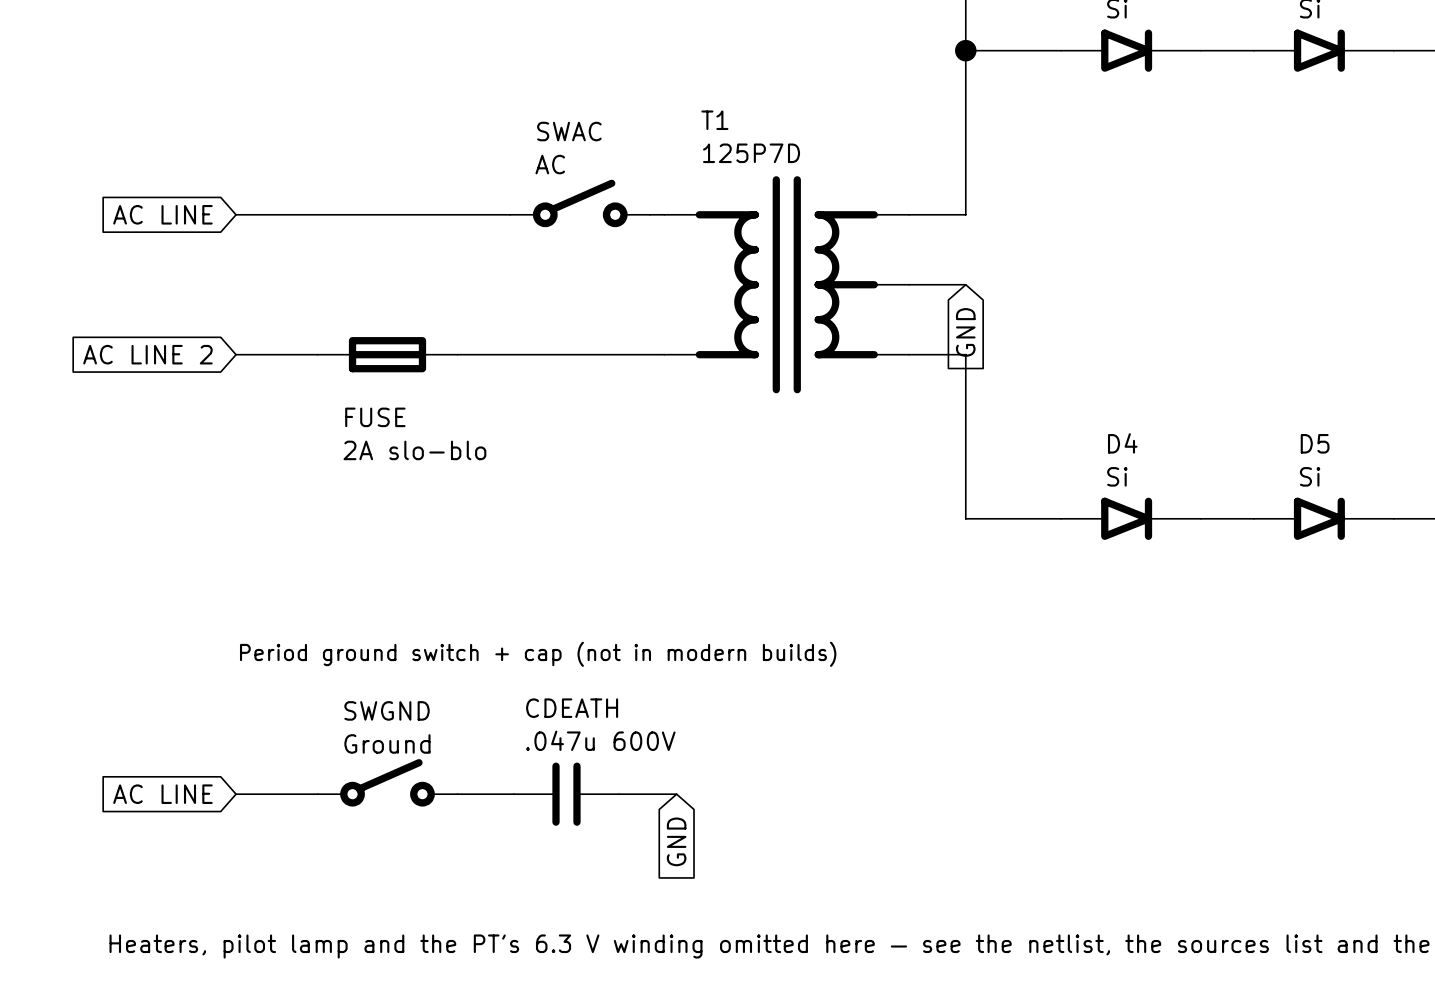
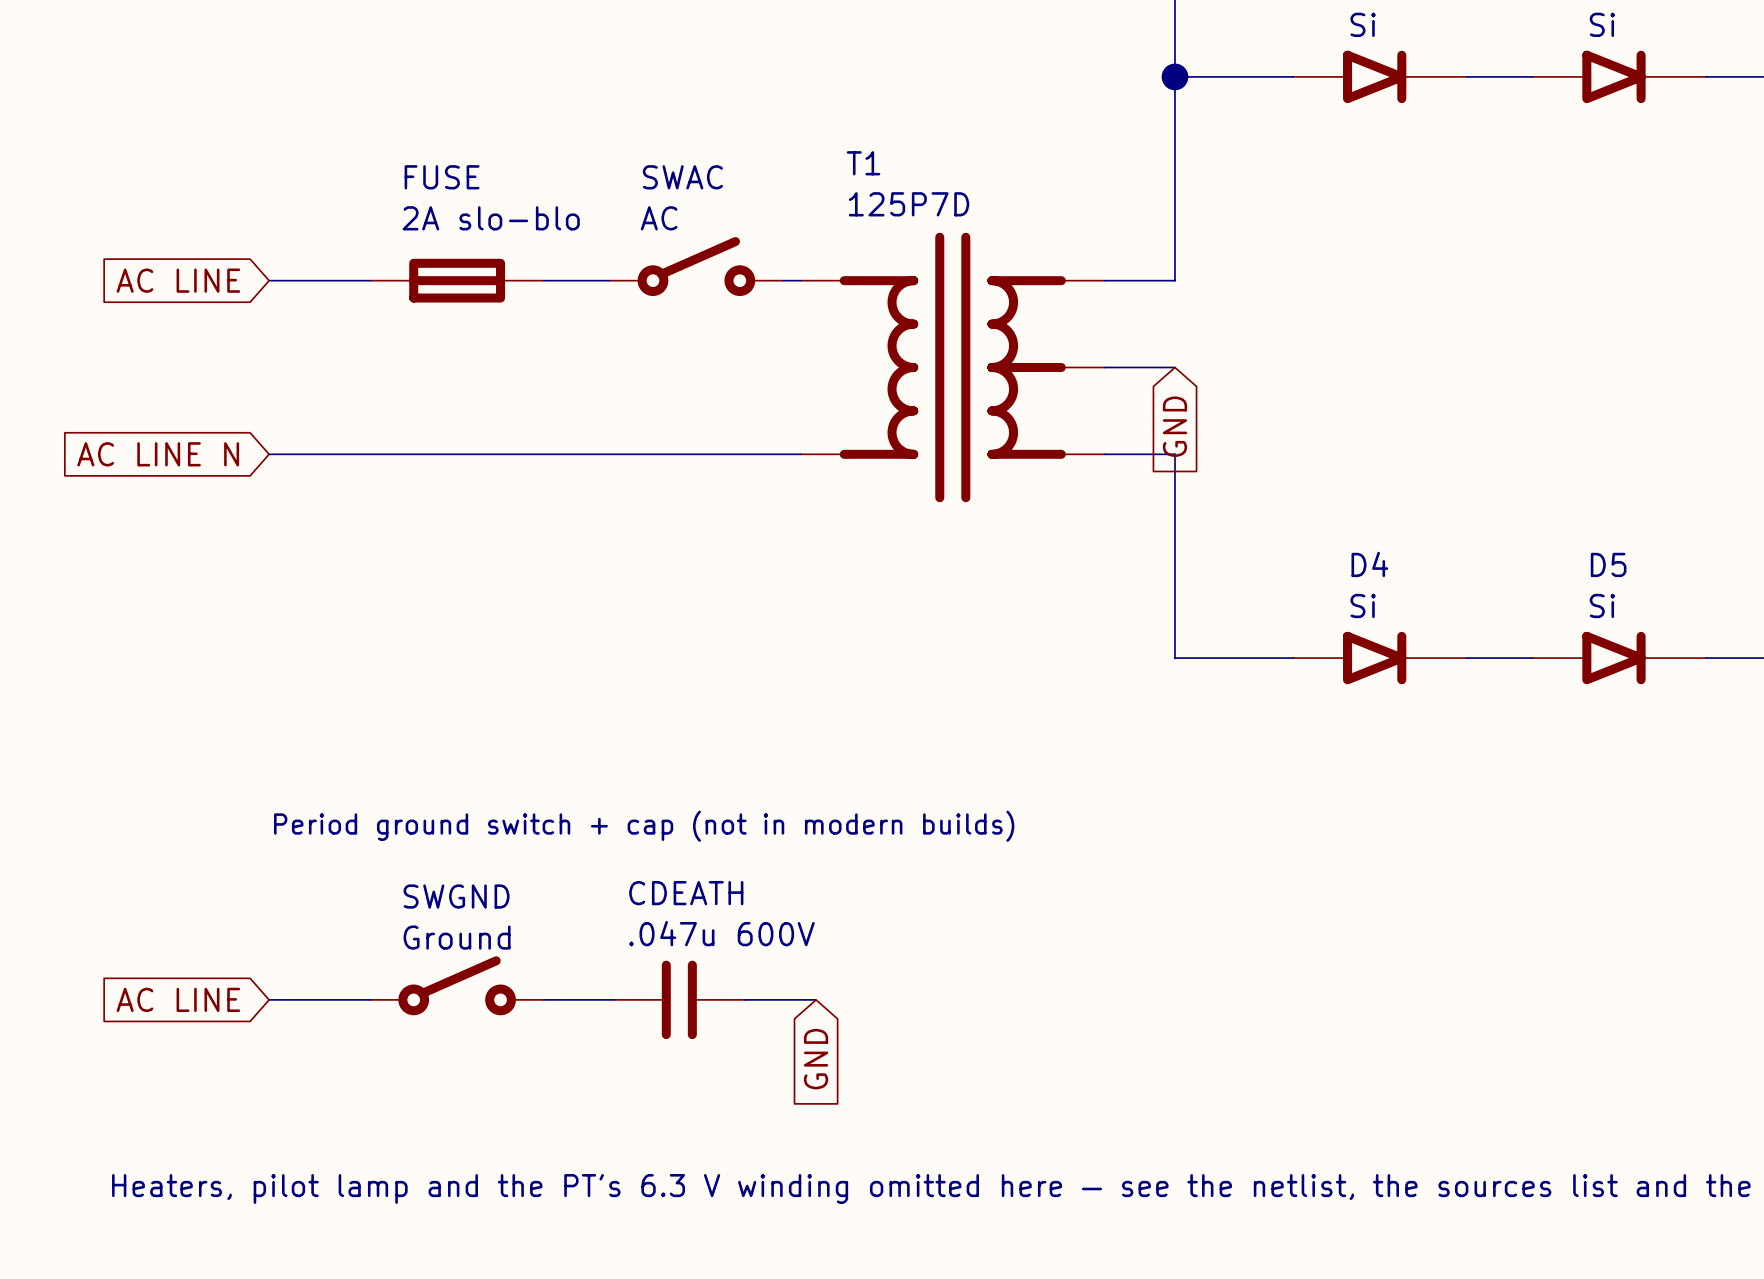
global label: AC LINE 2 (147, 354) -> AC LINE N (158, 454)
FUSE position: (387, 354) -> (457, 280)
FUSE name position: FUSE (375, 417) -> FUSE (442, 177)
FUSE value position: 2A slo-blo (414, 450) -> 2A slo-blo (491, 218)

